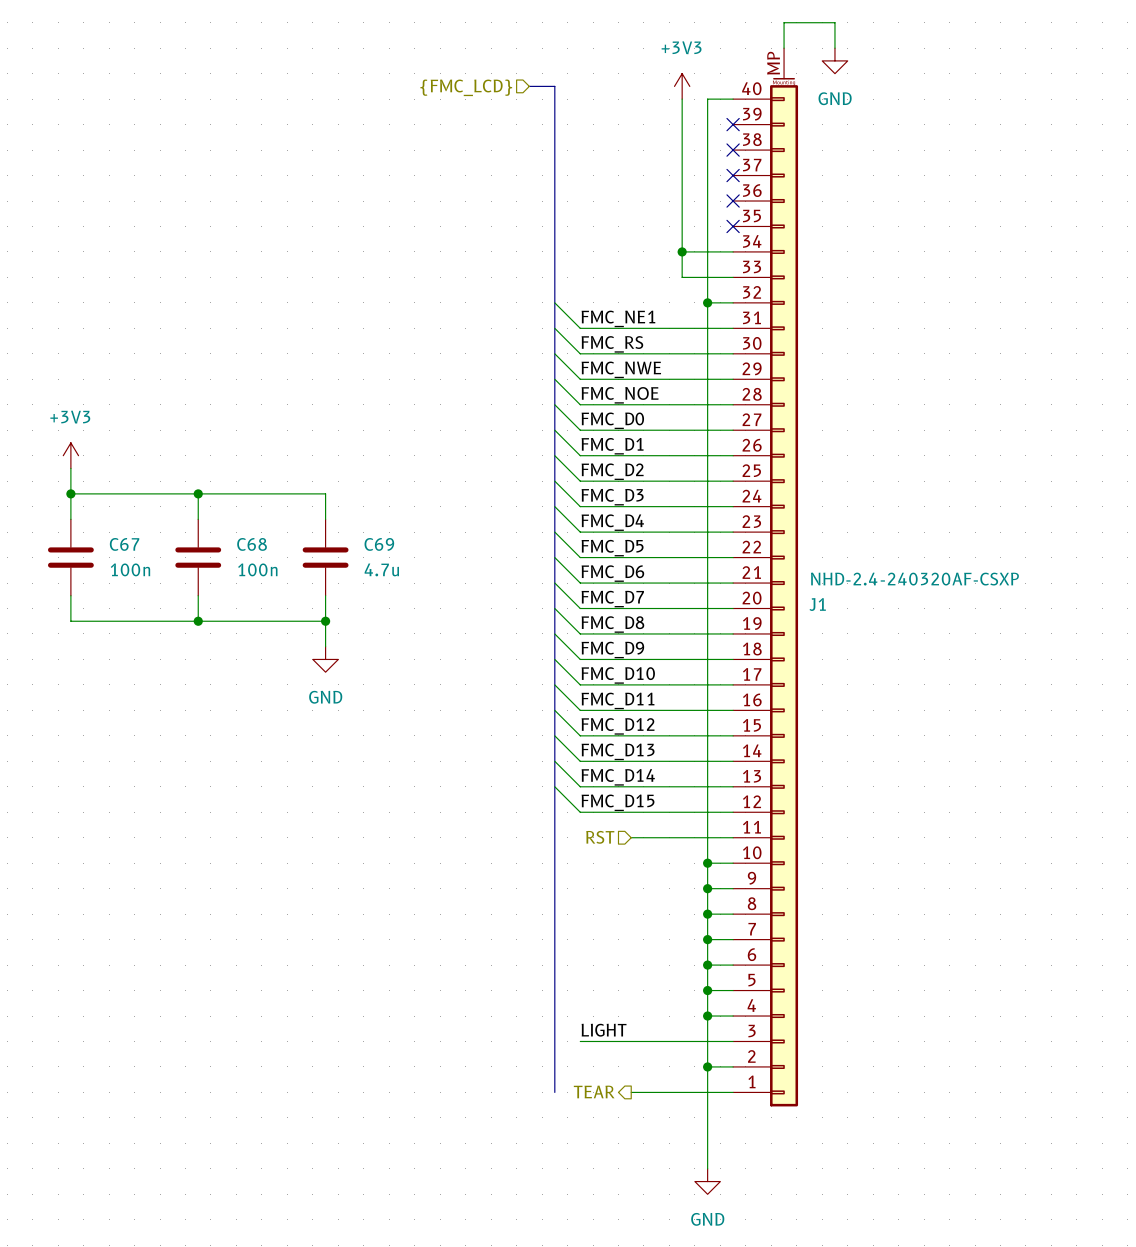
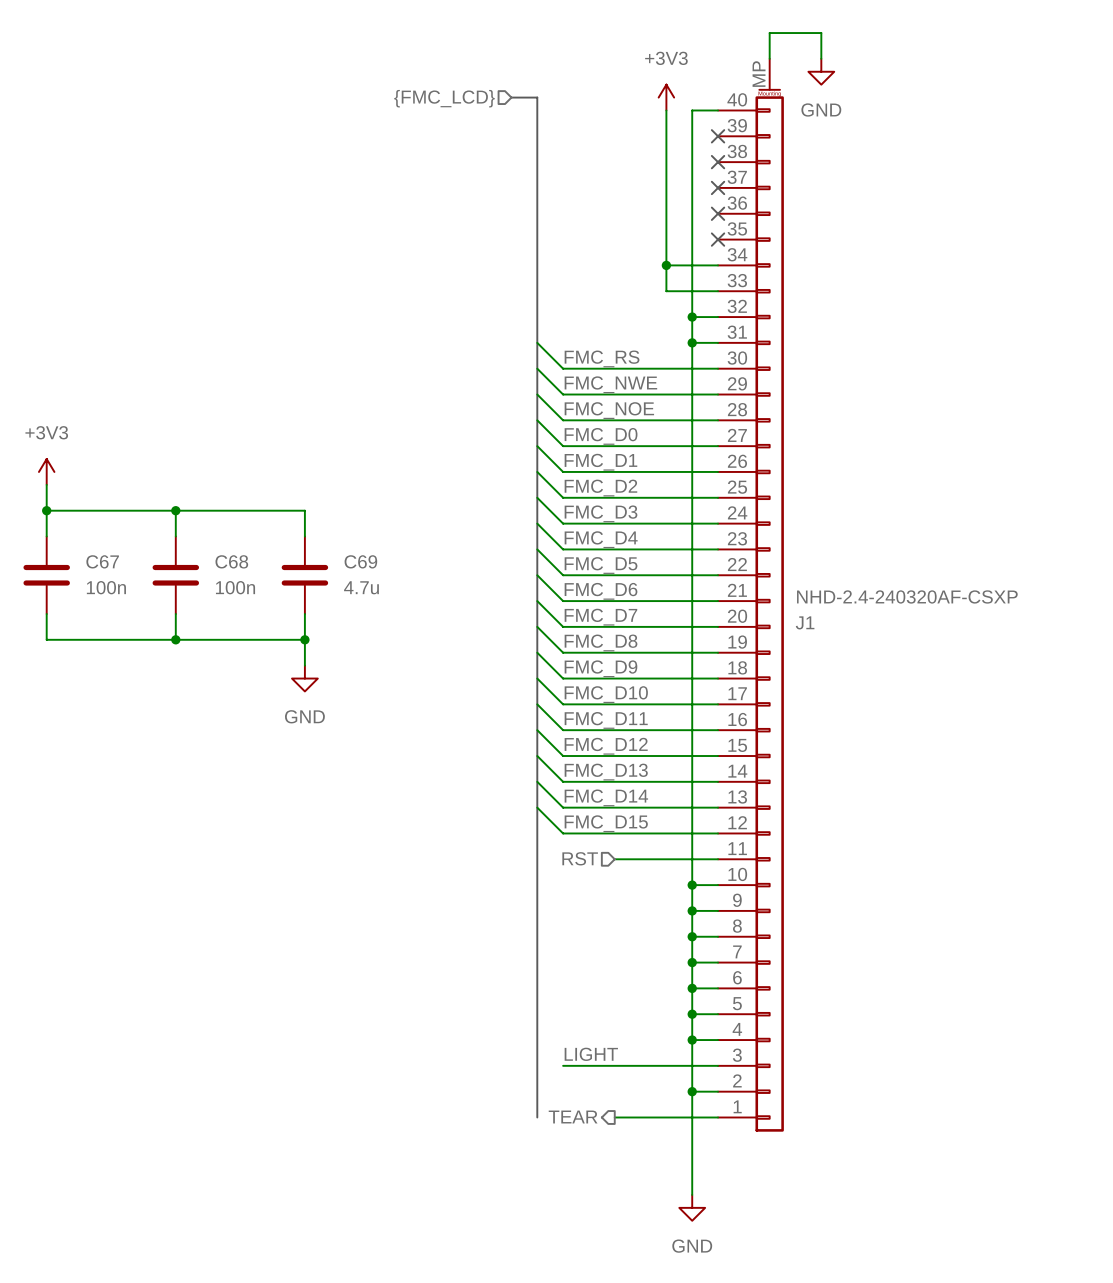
wire: (554, 302) (580, 328) (707, 328) -> none
label: FMC_NE1 (618, 318) -> none
junction: none -> (692, 342)

